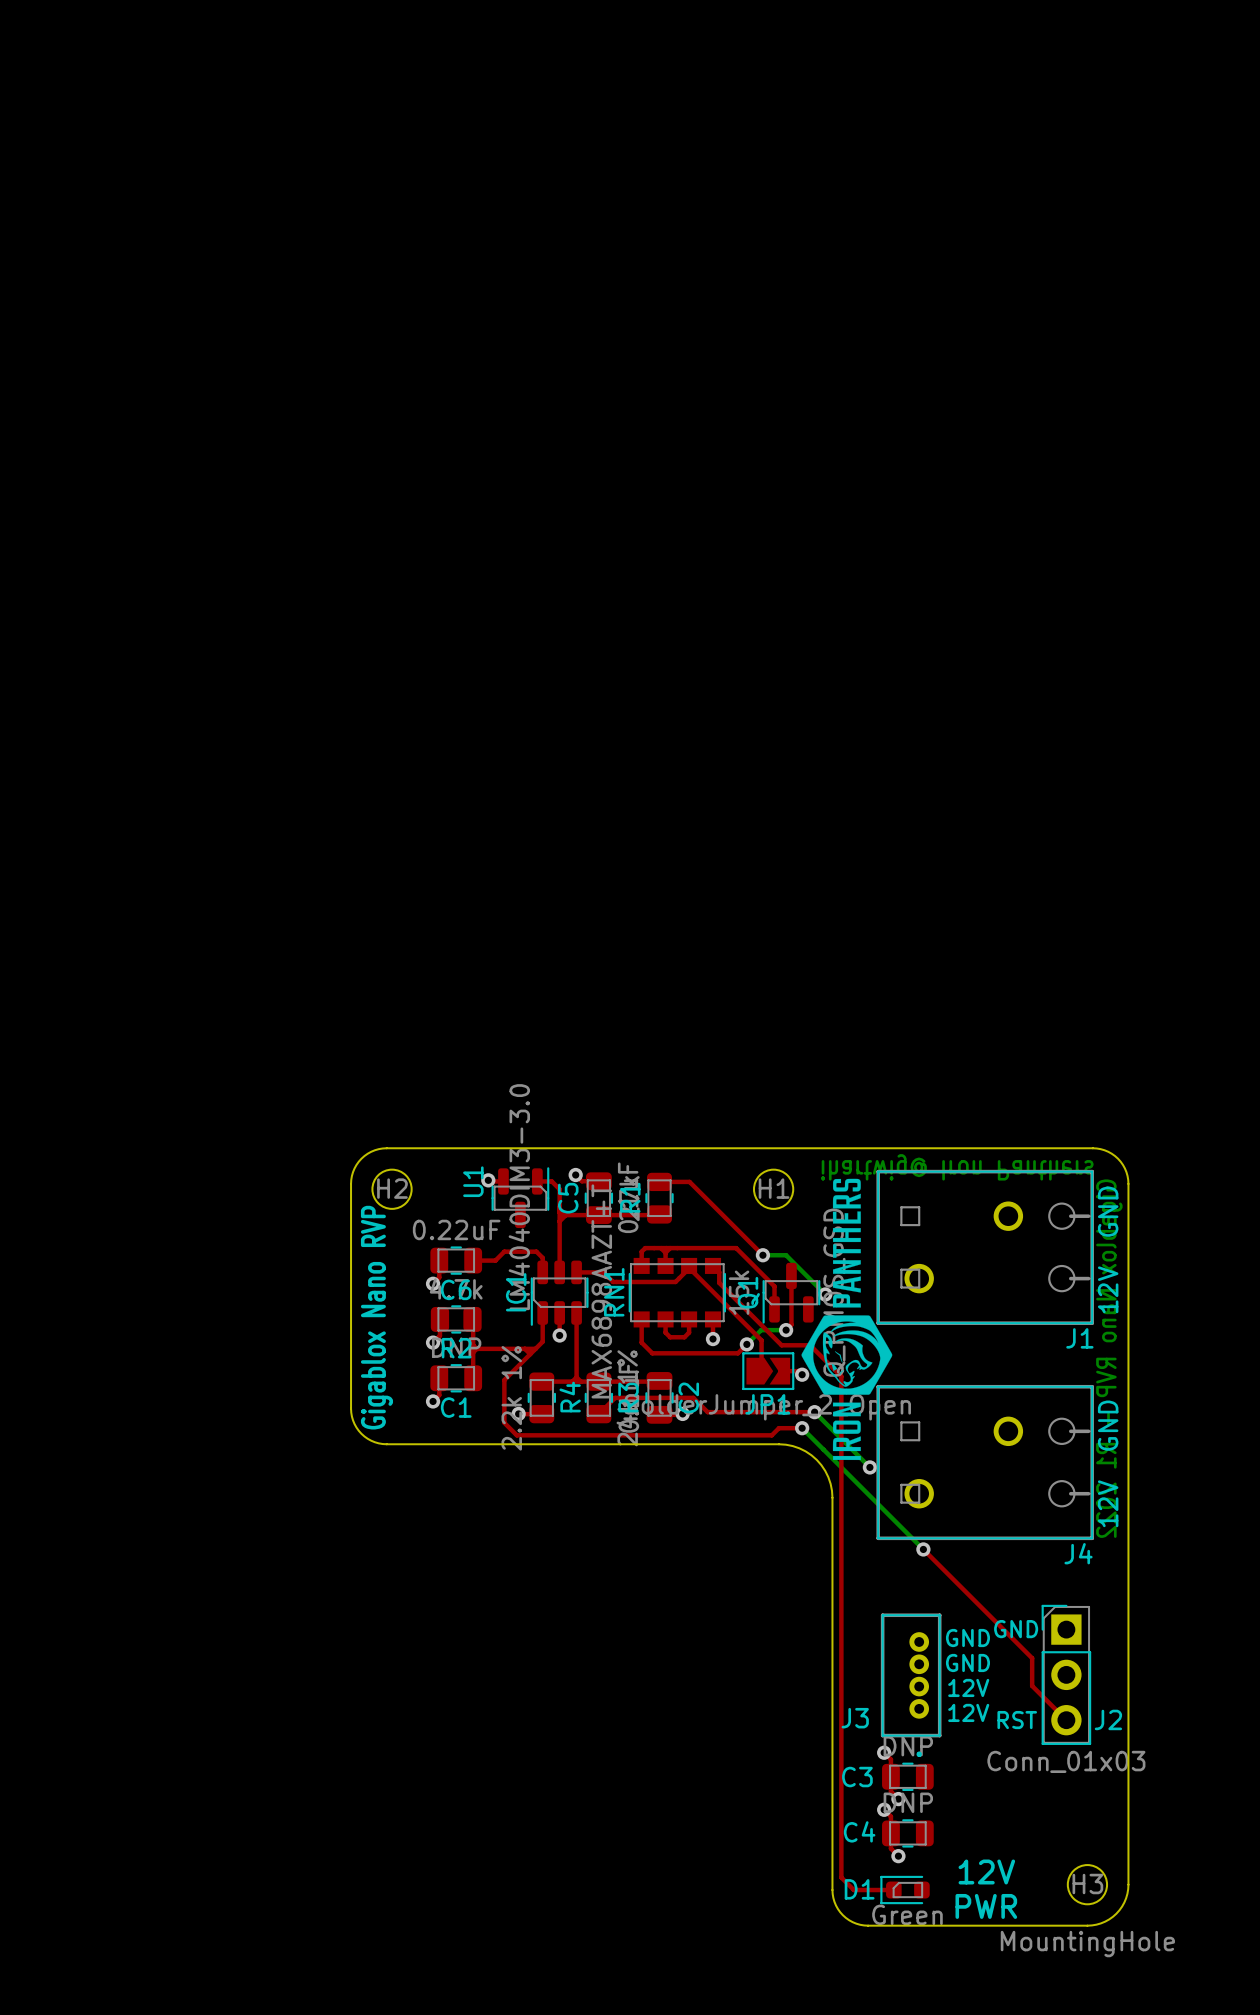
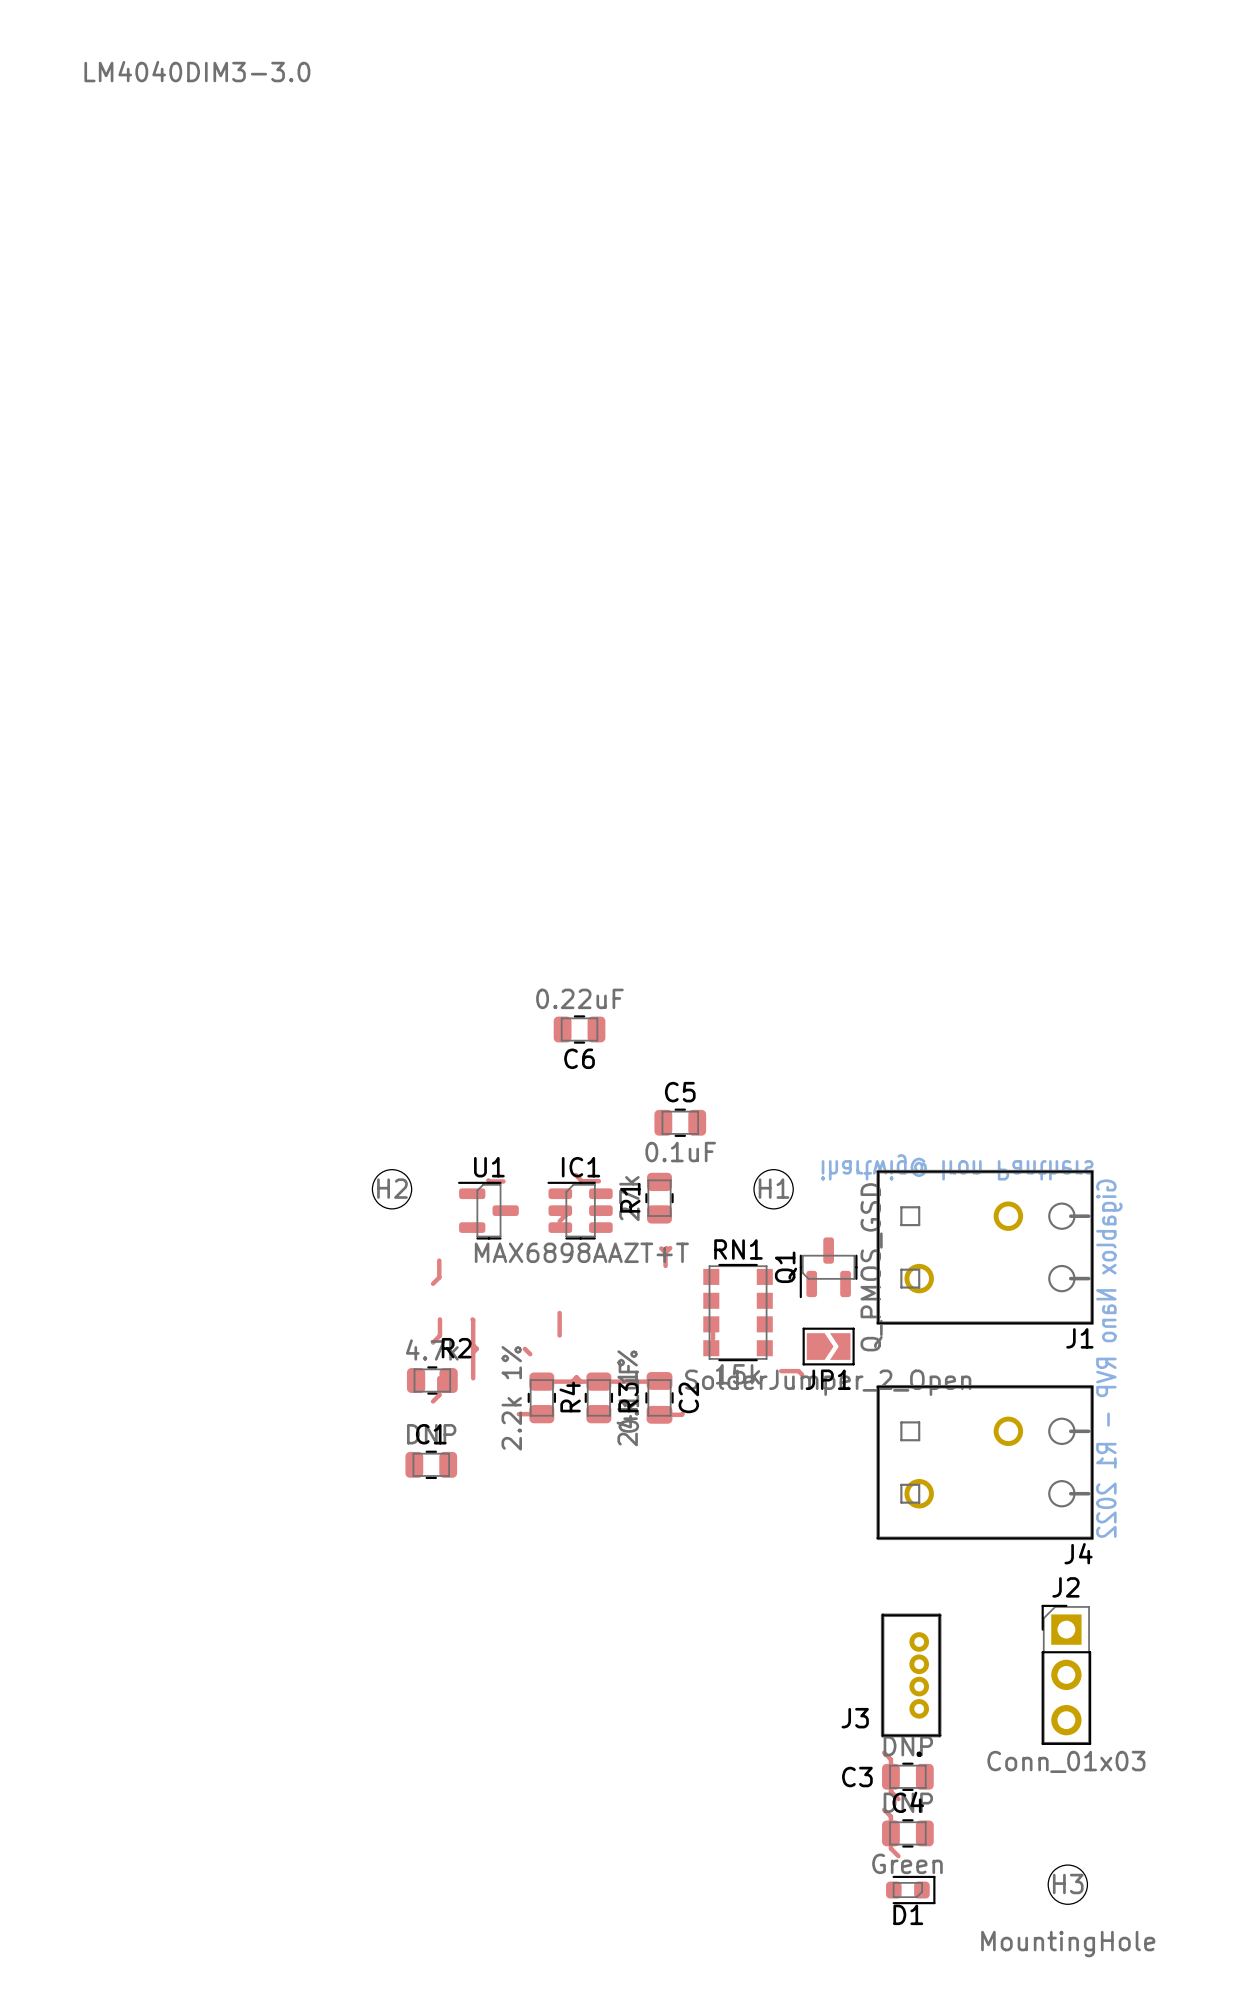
board edge: (386, 1148) (1092, 1148) (1104, 1150) (1118, 1158) (1124, 1168) (1128, 1183) (1128, 1884) (1124, 1902) (1116, 1913) (1105, 1921) (1087, 1925) (868, 1925) (849, 1920) (837, 1908) (832, 1890) (832, 1490) (828, 1477) (821, 1465) (805, 1451) (792, 1446) (778, 1444) (386, 1444) (371, 1440) (361, 1433) (353, 1420) (351, 1408) (351, 1179) (356, 1164) (364, 1156) (374, 1150) (386, 1148) -> none
via: (575, 1175) -> none
drawing: [801, 1178, 893, 1461] -> none
via: (488, 1180) -> none
U1 name position: U1 (473, 1181) -> U1 (489, 1167)
top track: (537, 1181) (551, 1181) (559, 1189) (559, 1272) -> none
top track: (659, 1181) (689, 1181) (762, 1255) -> none
U1 value position: LM4040DIM3-3.0 (519, 1197) -> LM4040DIM3-3.0 (197, 71)
U1 rotation: 0° (520, 1197) -> 90° counterclockwise (488, 1210)
C5 rotation: 0° (598, 1198) -> 90° clockwise (680, 1122)
C5 position: (598, 1198) -> (680, 1122)
top track: (659, 1214) (565, 1215) -> none
text: 12V GND (1108, 1249) -> none
bottom track: (762, 1255) (786, 1255) (825, 1294) -> none
via: (762, 1255) -> none
C6 position: (456, 1260) -> (579, 1029)
top track: (473, 1260) (495, 1260) (504, 1251) (536, 1251) (542, 1257) (542, 1272) -> none
top track: (641, 1265) (641, 1251) (645, 1248) (736, 1248) (774, 1286) (774, 1309) -> none
top track: (689, 1265) (689, 1268) (675, 1281) (613, 1281) (603, 1272) (576, 1272) -> none
top track: (712, 1265) (719, 1272) (719, 1282) (781, 1345) (810, 1345) (841, 1376) (841, 1877) (853, 1890) (893, 1890) -> none
top track: (689, 1267) (761, 1340) (761, 1364) (755, 1371) -> none
top track: (791, 1275) (791, 1324) (786, 1330) -> none
via: (433, 1283) -> none
RN1 rotation: 0° (677, 1292) -> 90° clockwise (738, 1312)
RN1 position: (677, 1292) -> (738, 1312)
IC1 rotation: 0° (559, 1293) -> 90° clockwise (580, 1210)
IC1 position: (559, 1293) -> (580, 1210)
Q1 position: (791, 1293) -> (828, 1267)
via: (825, 1294) -> none
top track: (542, 1312) (542, 1341) (504, 1380) (504, 1422) (516, 1435) (771, 1435) (778, 1428) (802, 1428) -> none
top track: (576, 1312) (576, 1377) -> none
text: Gigablox Nano RVP (376, 1317) -> none
R2 position: (456, 1319) -> (432, 1380)
top track: (641, 1319) (641, 1342) (652, 1353) (737, 1353) (746, 1344) -> none
top track: (665, 1319) (665, 1332) (670, 1337) (684, 1337) (689, 1332) (689, 1319) -> none
bottom track: (786, 1330) (761, 1330) (746, 1344) -> none
via: (786, 1330) -> none
via: (559, 1335) -> none
via: (712, 1339) -> none
via: (433, 1342) -> none
via: (746, 1344) -> none
top track: (473, 1348) (535, 1348) -> none
JP1 position: (768, 1371) -> (828, 1346)
via: (802, 1374) -> none
C1 position: (456, 1378) -> (431, 1464)
via: (433, 1401) -> none
C1 name position: C1 (456, 1407) -> C1 (431, 1434)
top track: (814, 1412) (707, 1412) (693, 1397) (615, 1397) (598, 1414) -> none
bottom track: (814, 1412) (869, 1467) -> none
via: (814, 1412) -> none
via: (518, 1413) -> none
via: (682, 1413) -> none
bottom track: (802, 1428) (923, 1549) -> none
via: (802, 1428) -> none
text: 12V GND (1108, 1463) -> none
via: (869, 1467) -> none
top track: (923, 1549) (1032, 1658) (1032, 1685) (1066, 1720) -> none
via: (923, 1549) -> none
text: GND (1016, 1629) -> none
text: GND (967, 1638) -> none
text: GND (967, 1662) -> none
text: 12V (968, 1687) -> none
text: 12V (968, 1712) -> none
J2 name position: J2 (1108, 1719) -> J2 (1065, 1587)
text: RST (1017, 1720) -> none
via: (884, 1752) -> none
via: (898, 1799) -> none
via: (884, 1809) -> none
C4 name position: C4 (859, 1831) -> C4 (908, 1802)
via: (898, 1856) -> none
text: 12V (986, 1871) -> none
H3 position: (1087, 1884) -> (1067, 1884)
D1 name position: D1 (859, 1889) -> D1 (908, 1914)
D1 rotation: 0° (905, 1890) -> 180° (910, 1890)
text: PWR (986, 1906) -> none

